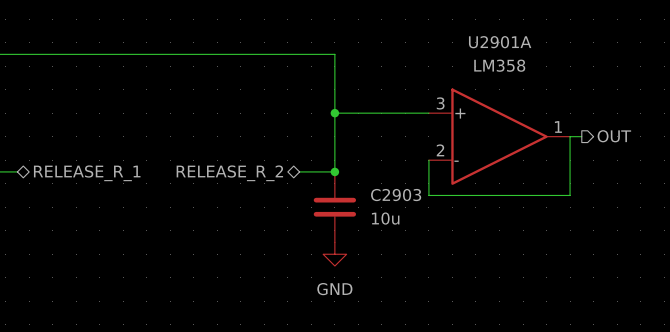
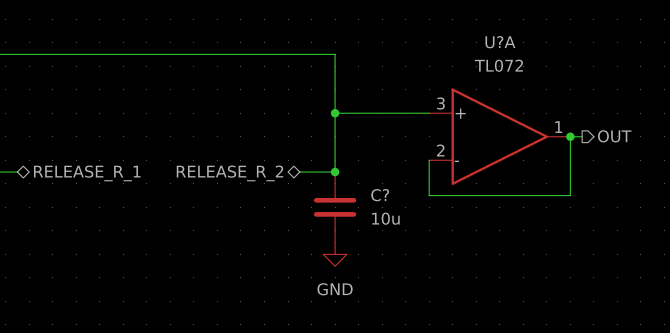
U2901A name: U2901A (500, 42) -> U?A (500, 42)
U2901A value: LM358 (499, 65) -> TL072 (498, 65)
junction: none -> (570, 136)
C2903 name: C2903 (396, 195) -> C? (380, 195)

